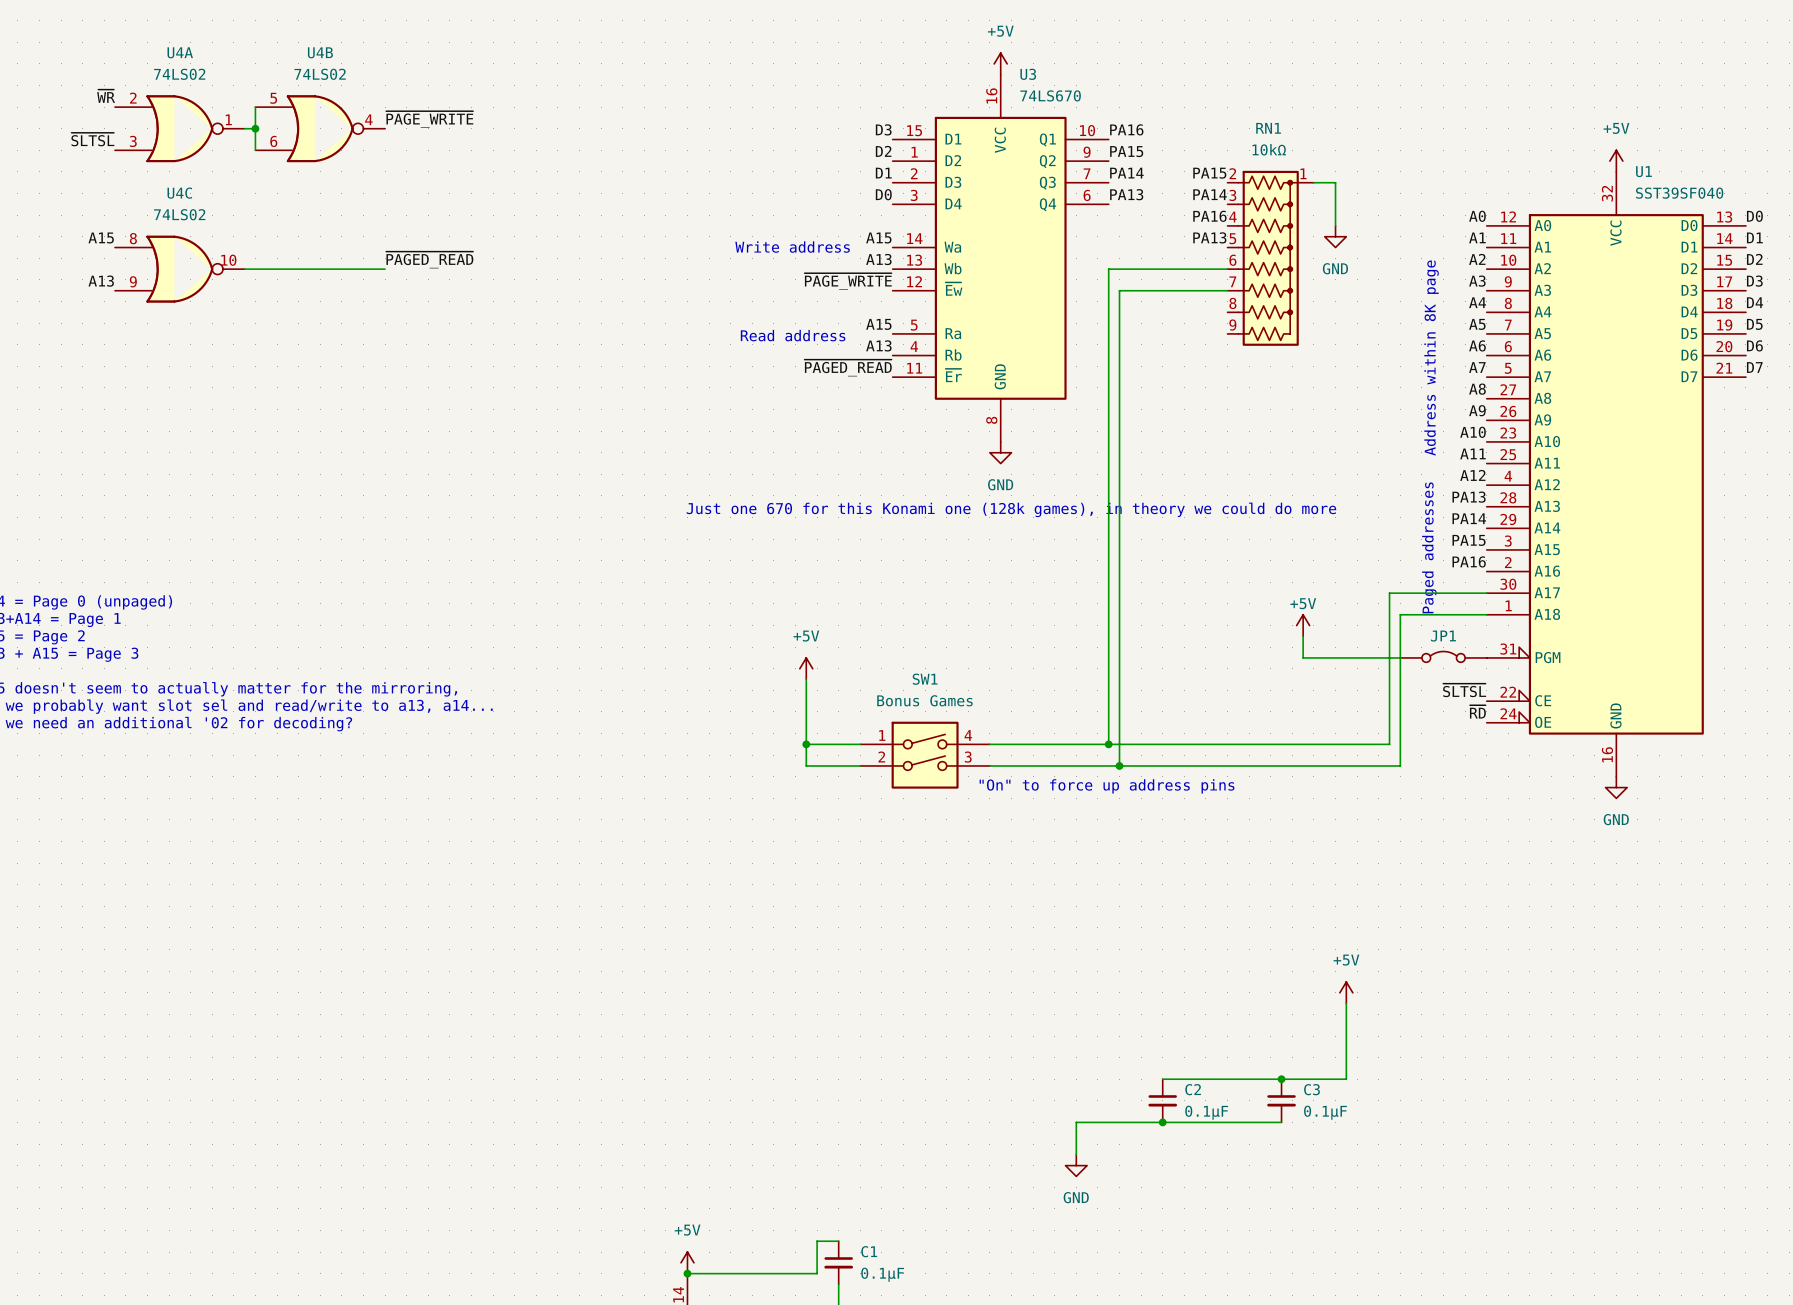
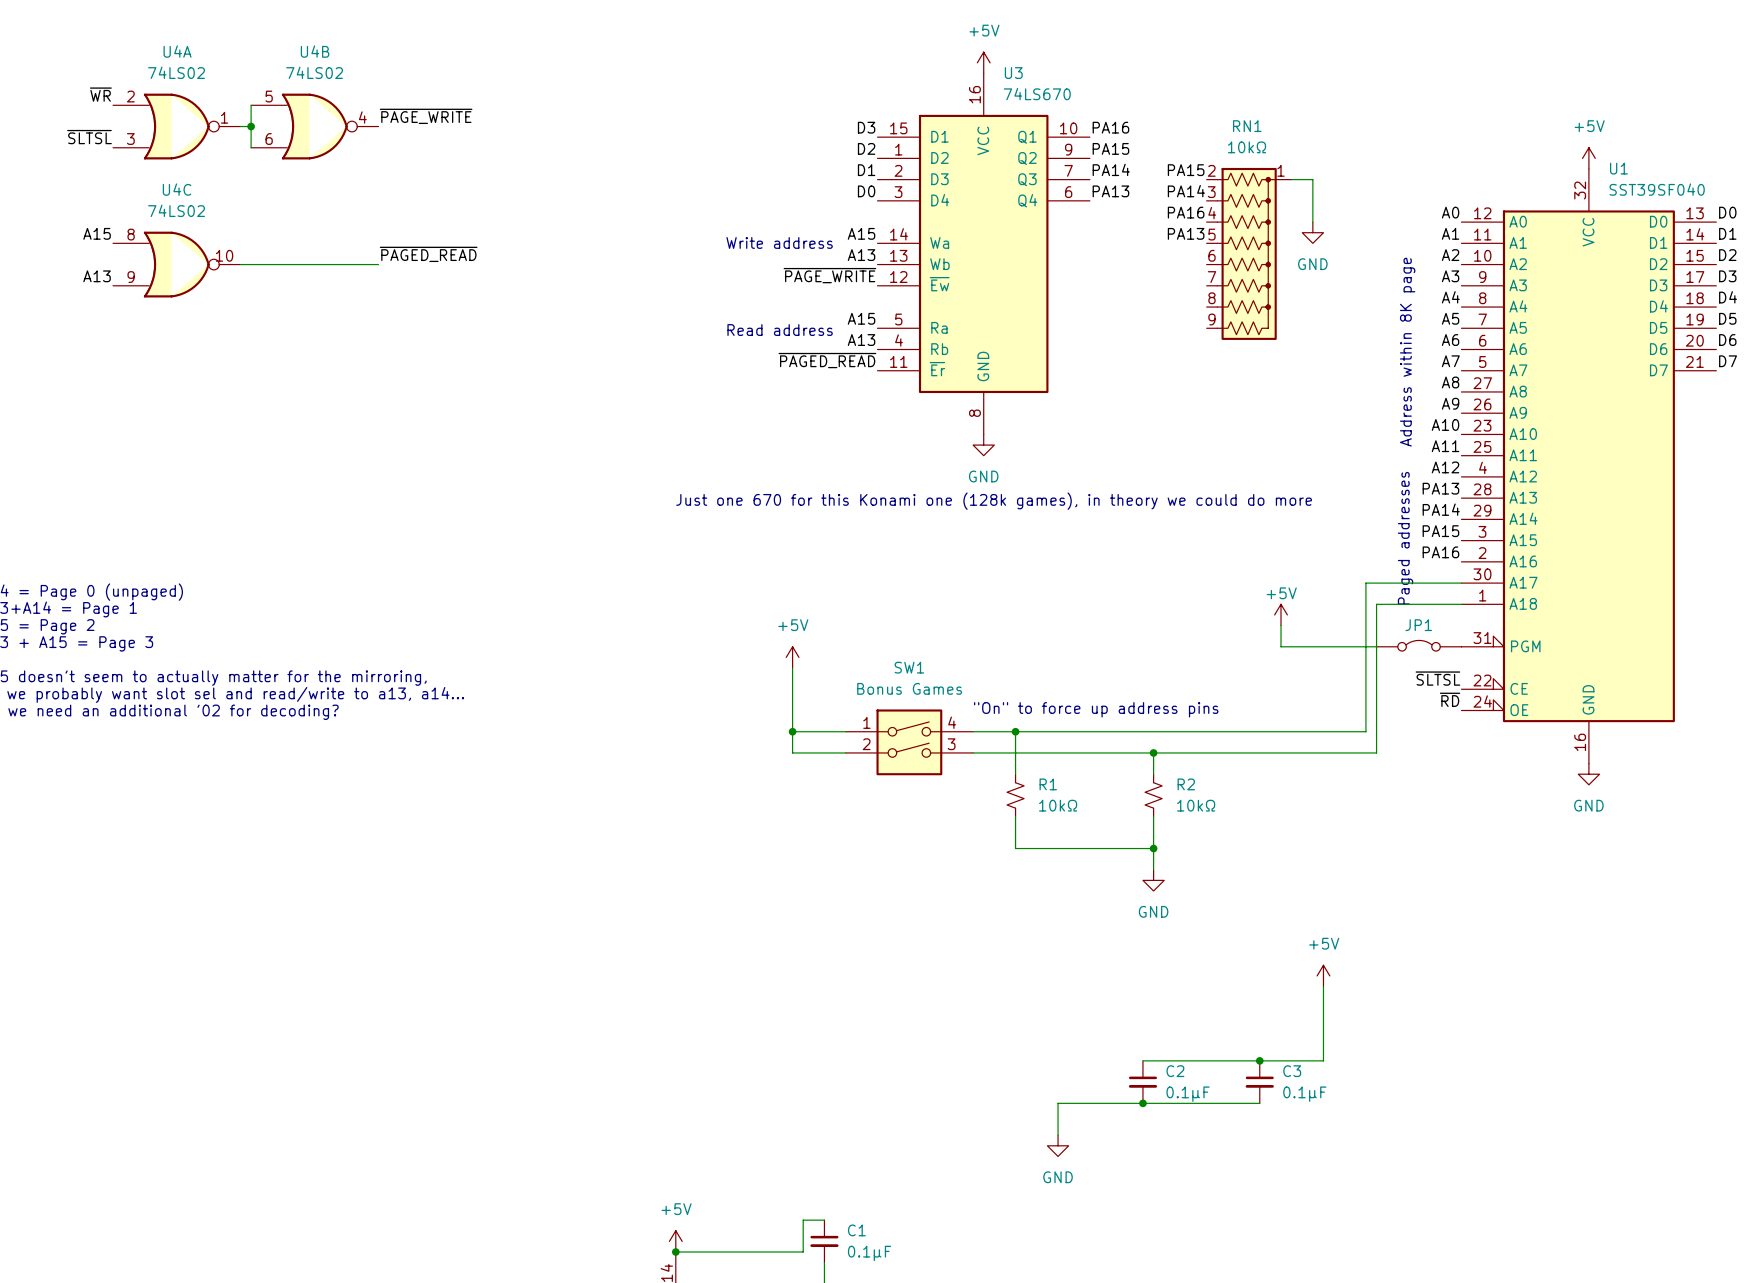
wire: (1227, 269) (1108, 269) (1108, 744) -> none
wire: (1227, 290) (1119, 290) (1119, 765) -> none
wire: none -> (1015, 731) (1015, 774)
junction: none -> (1015, 731)
junction: (1108, 744) -> none
junction: (1119, 765) -> none
wire: none -> (1153, 752) (1153, 774)
junction: none -> (1153, 752)
text position: "On" to force up address pins (1107, 786) -> "On" to force up address pins (1096, 709)
R1: none -> 10kΩ (1015, 795)
R2: none -> 10kΩ (1153, 795)
wire: none -> (1015, 816) (1015, 848) (1153, 848)
wire: none -> (1153, 816) (1153, 869)
junction: none -> (1153, 848)
power symbol: none -> GND (1153, 880)

